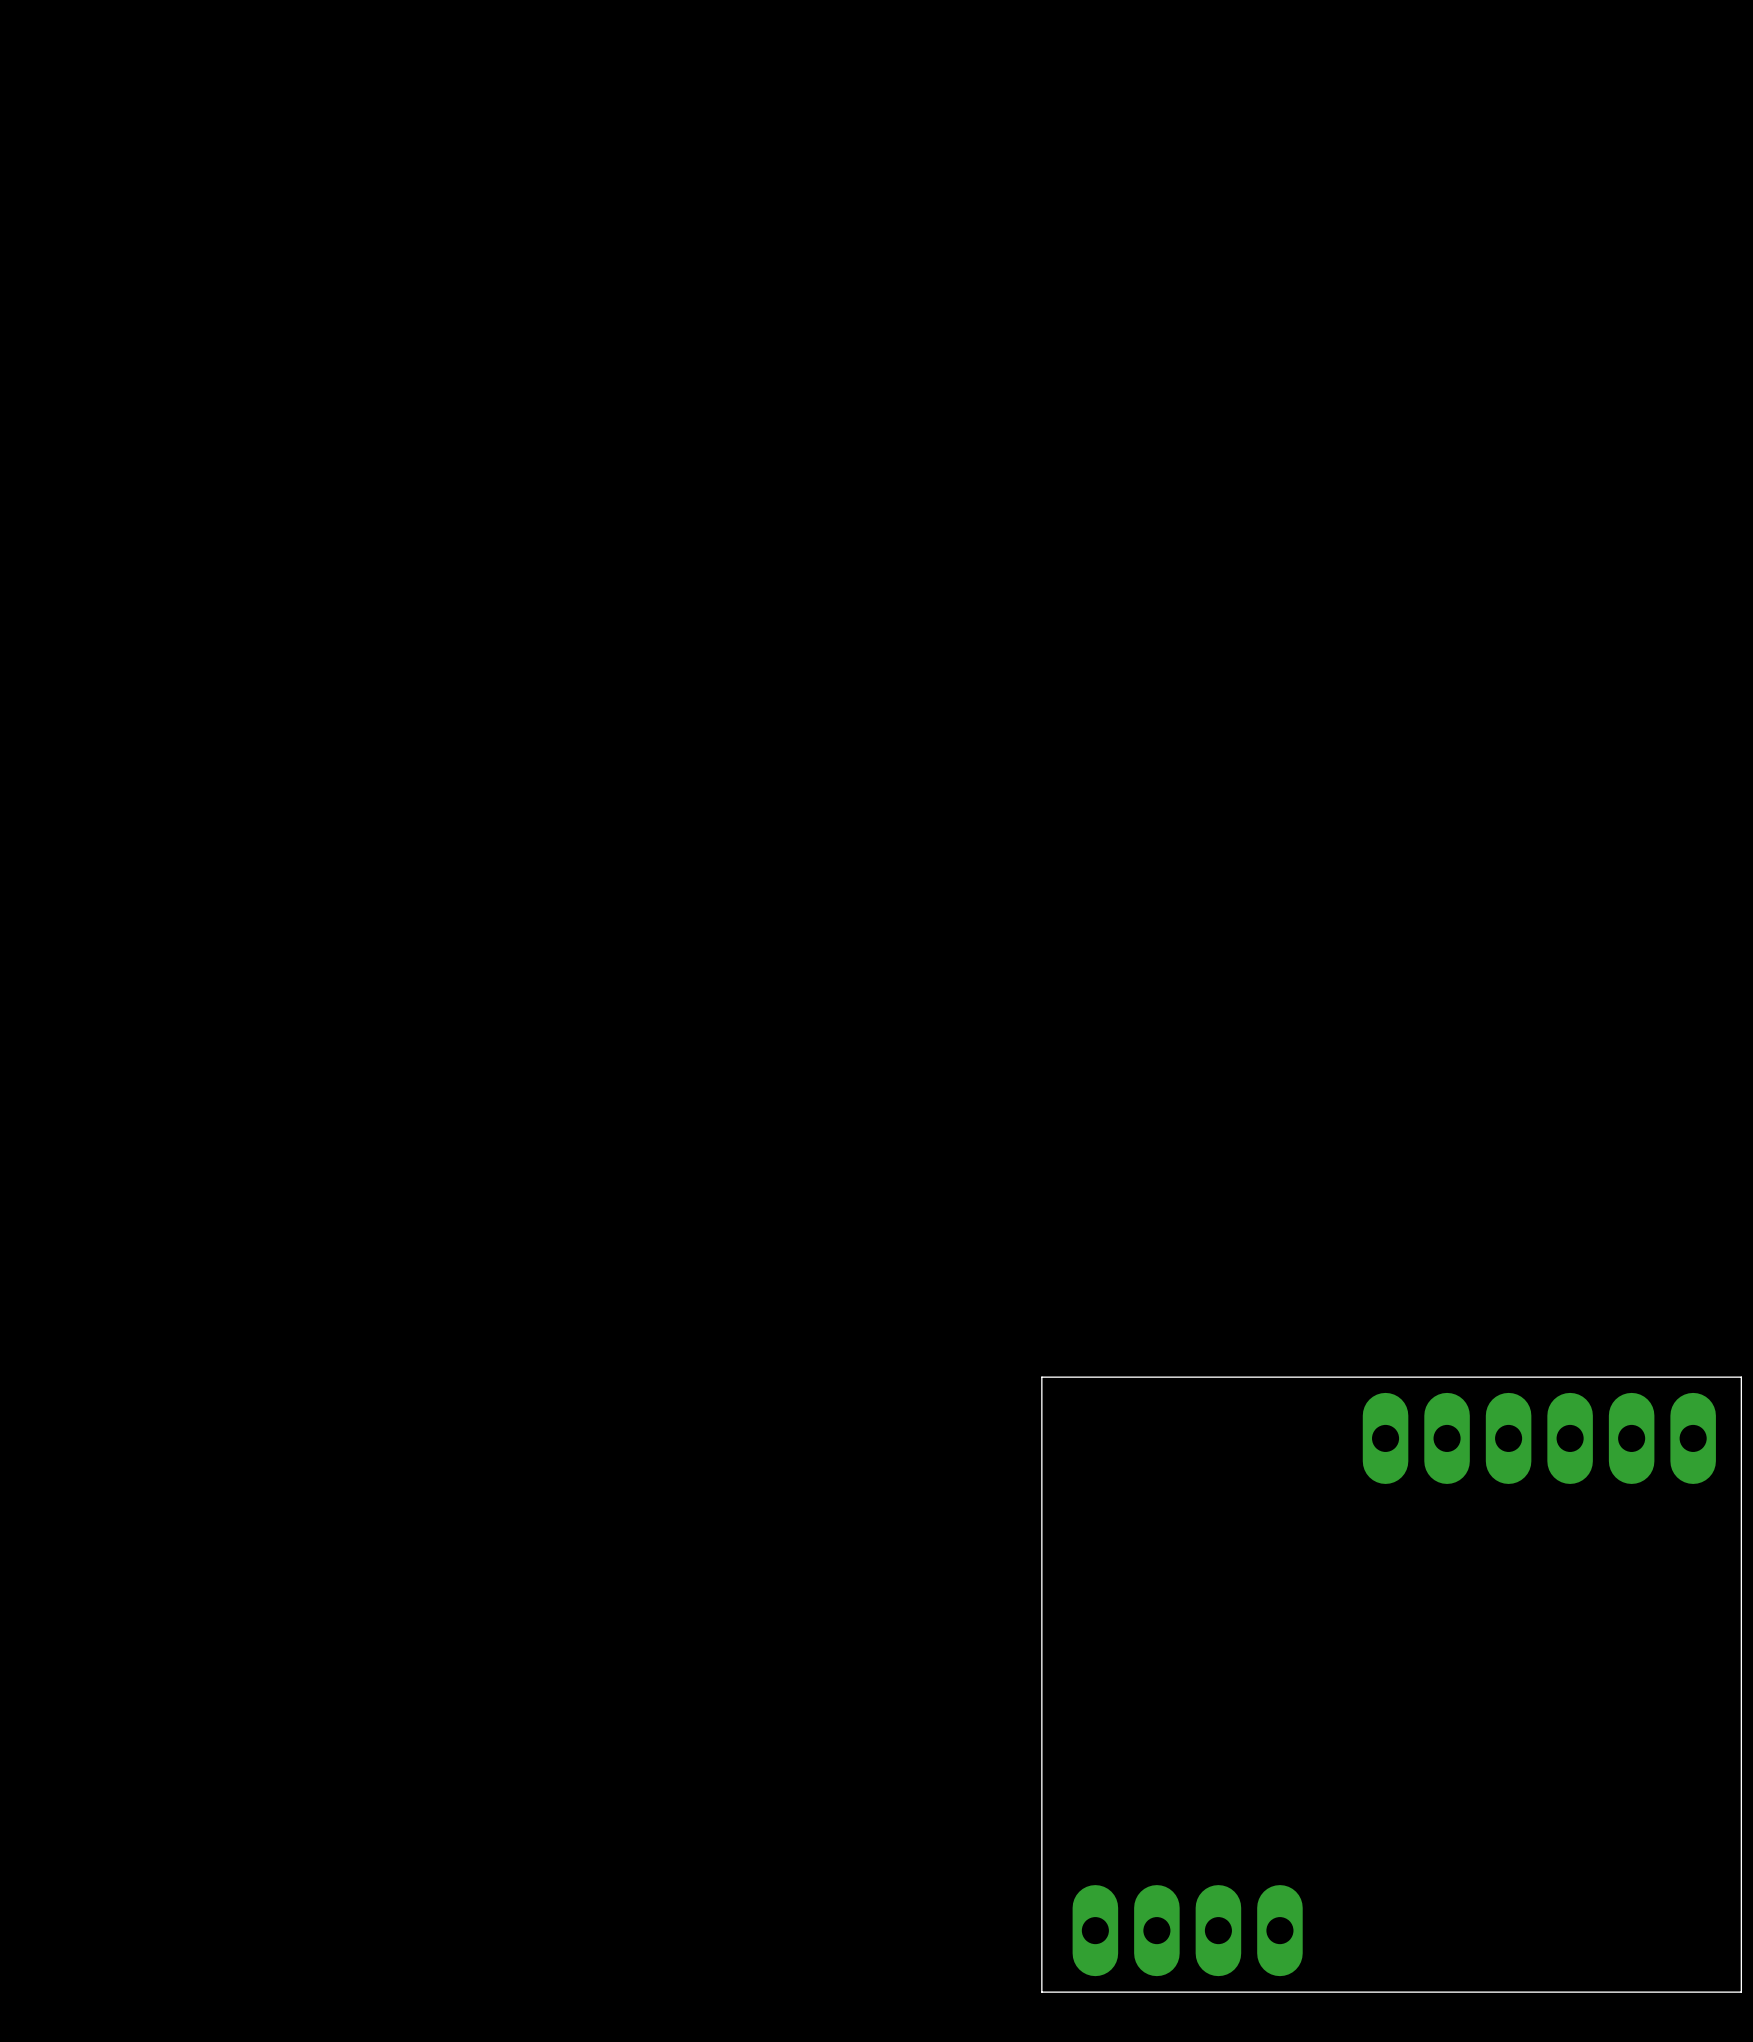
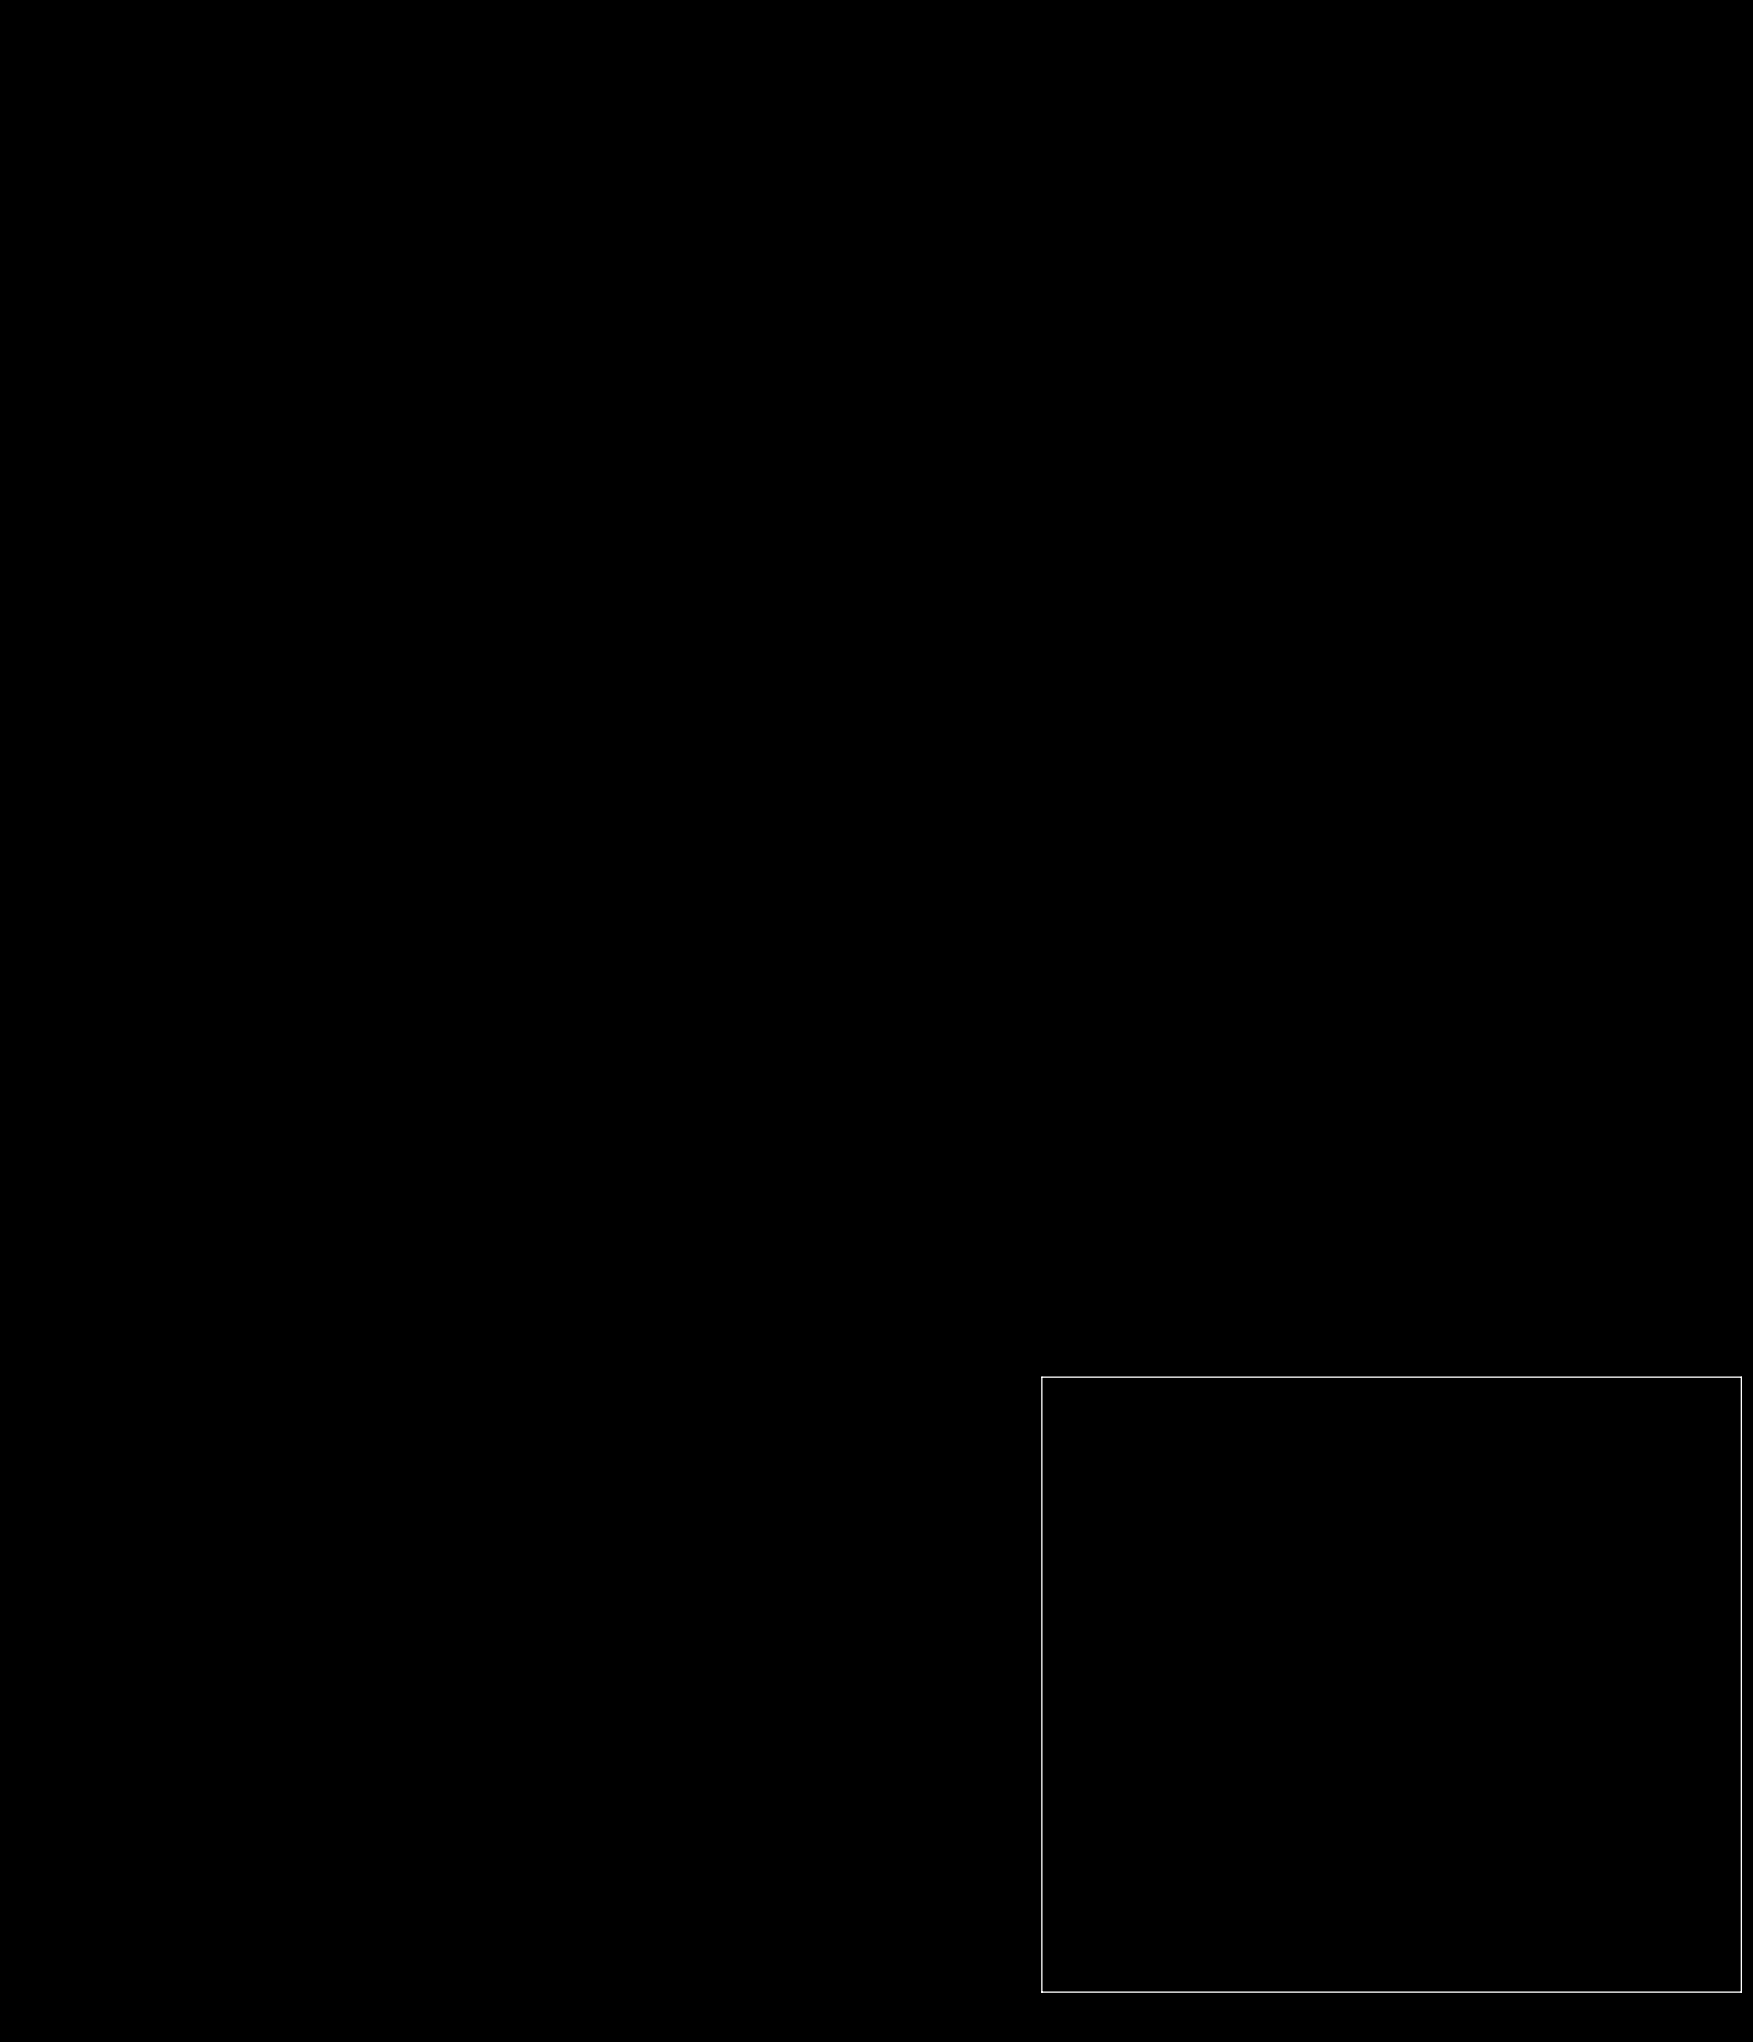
part: (1539, 1438) -> none
part: (1187, 1930) -> none

